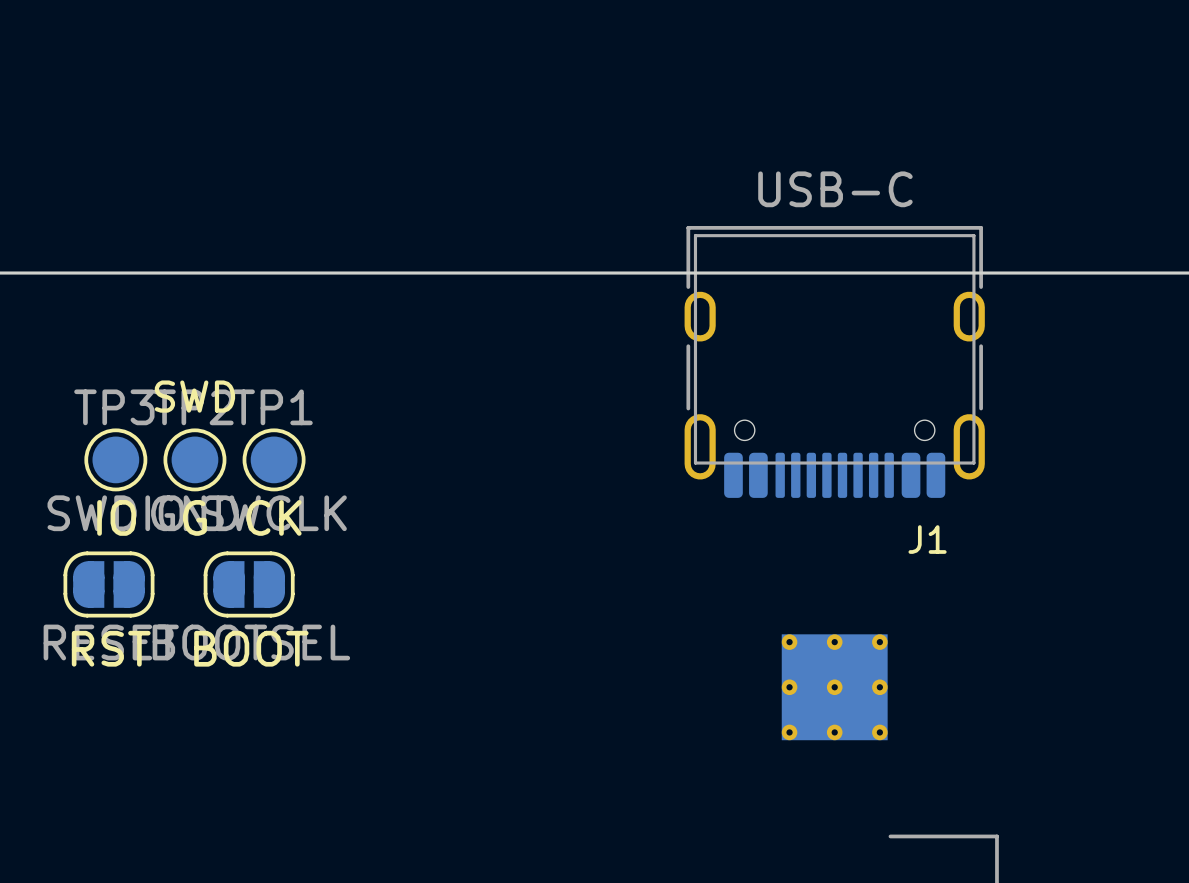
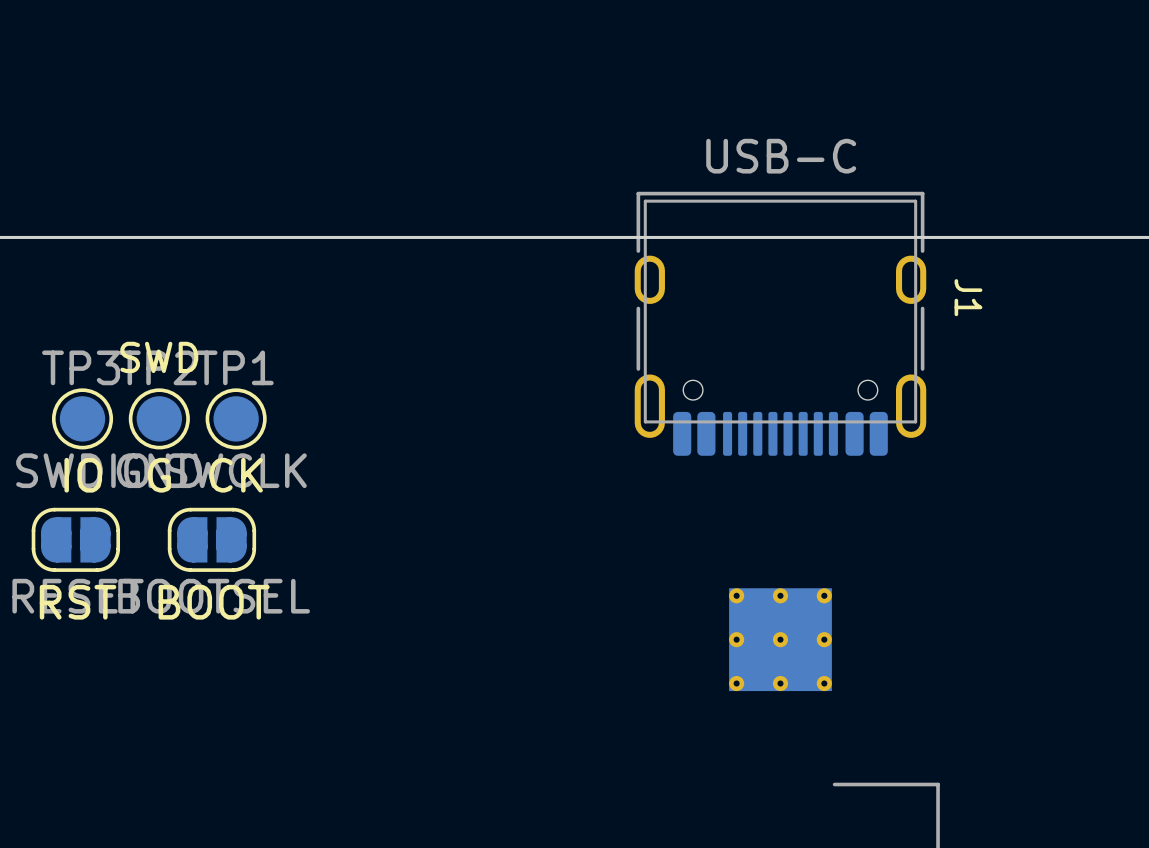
J1 name rotation: 0° (927, 539) -> 90° clockwise (968, 297)
J1 name position: J1 (927, 539) -> J1 (968, 297)

